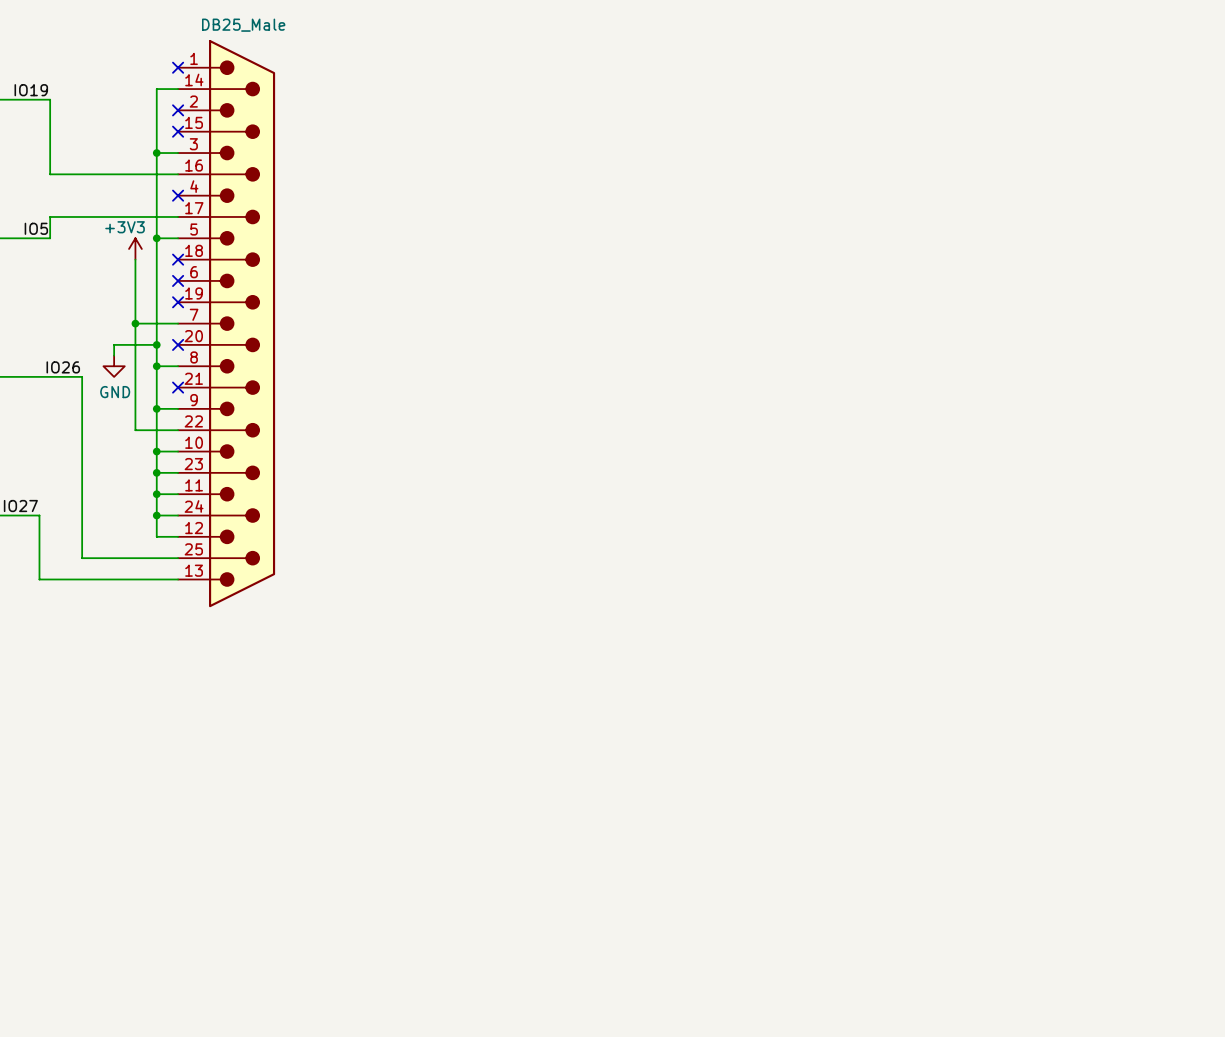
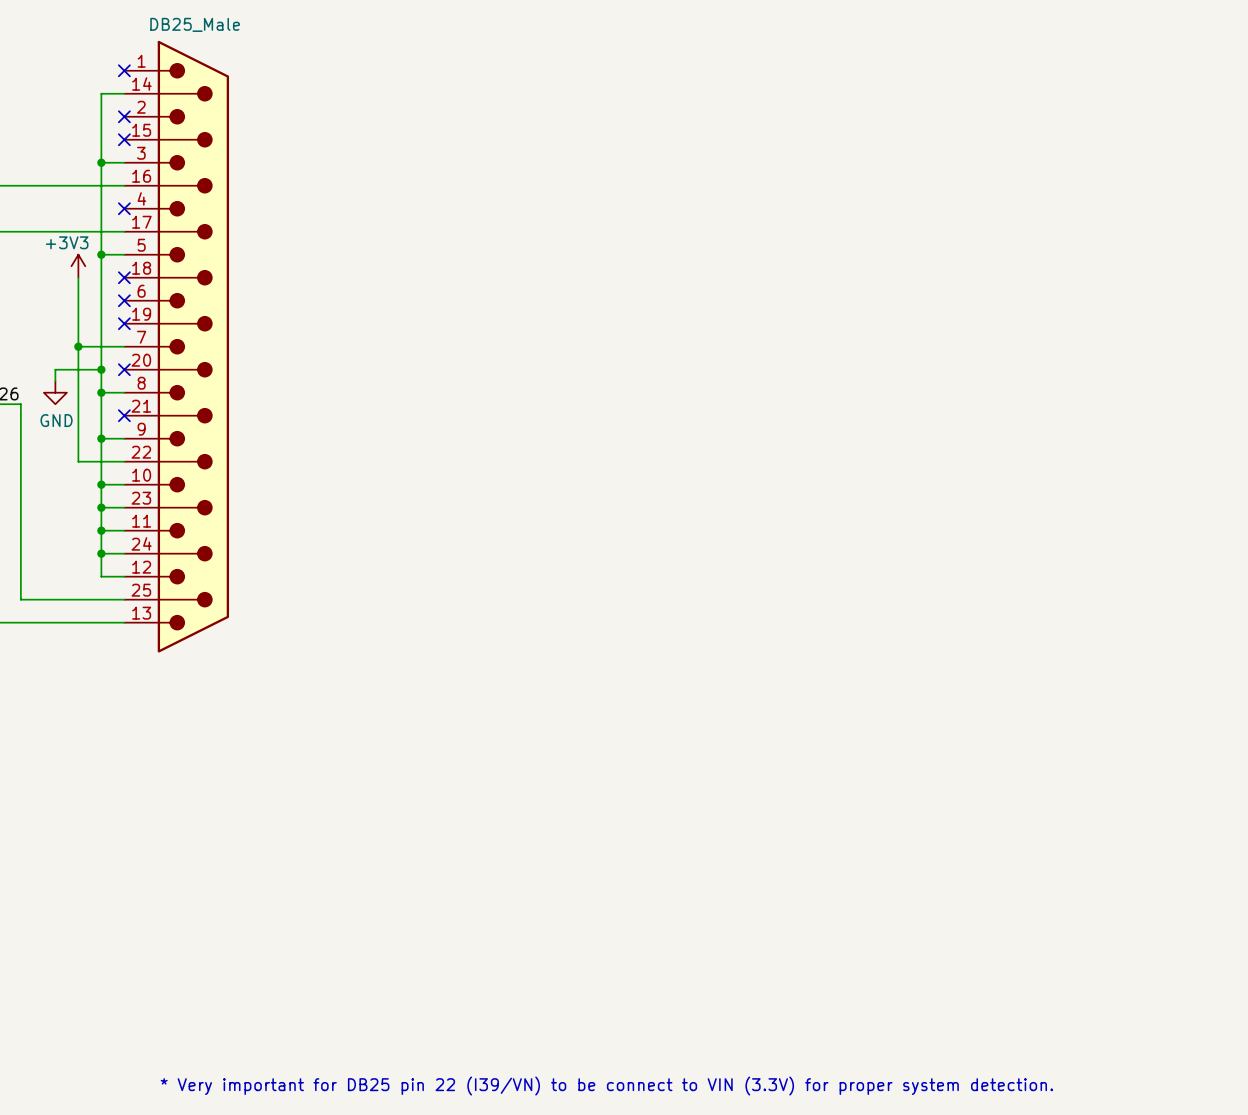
text: none -> * Very important for DB25 pin 22 (I39/VN) to be connect to VIN (3.3V) for proper system detection. (606, 1086)

